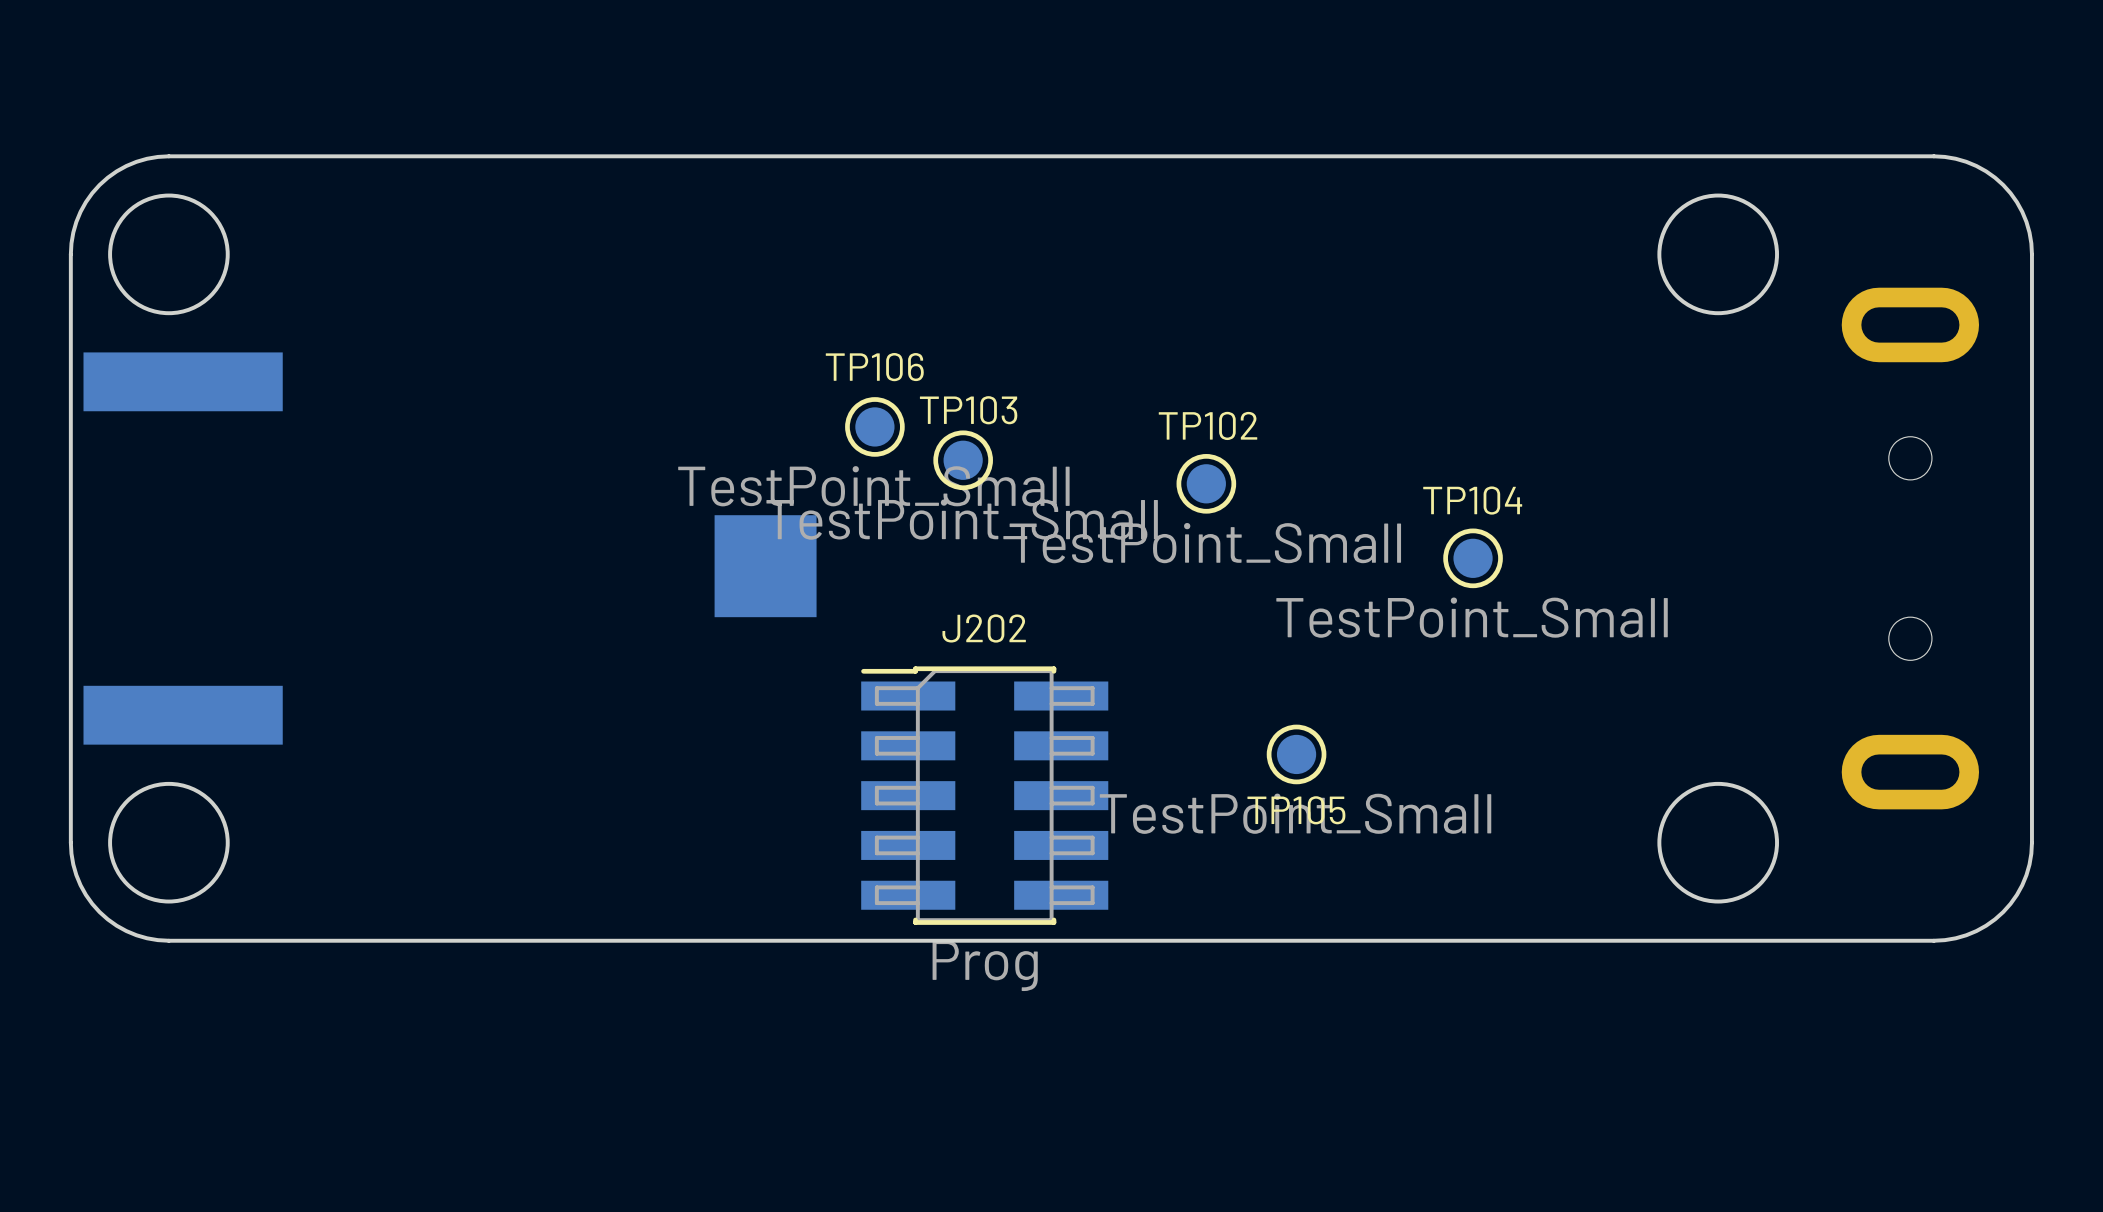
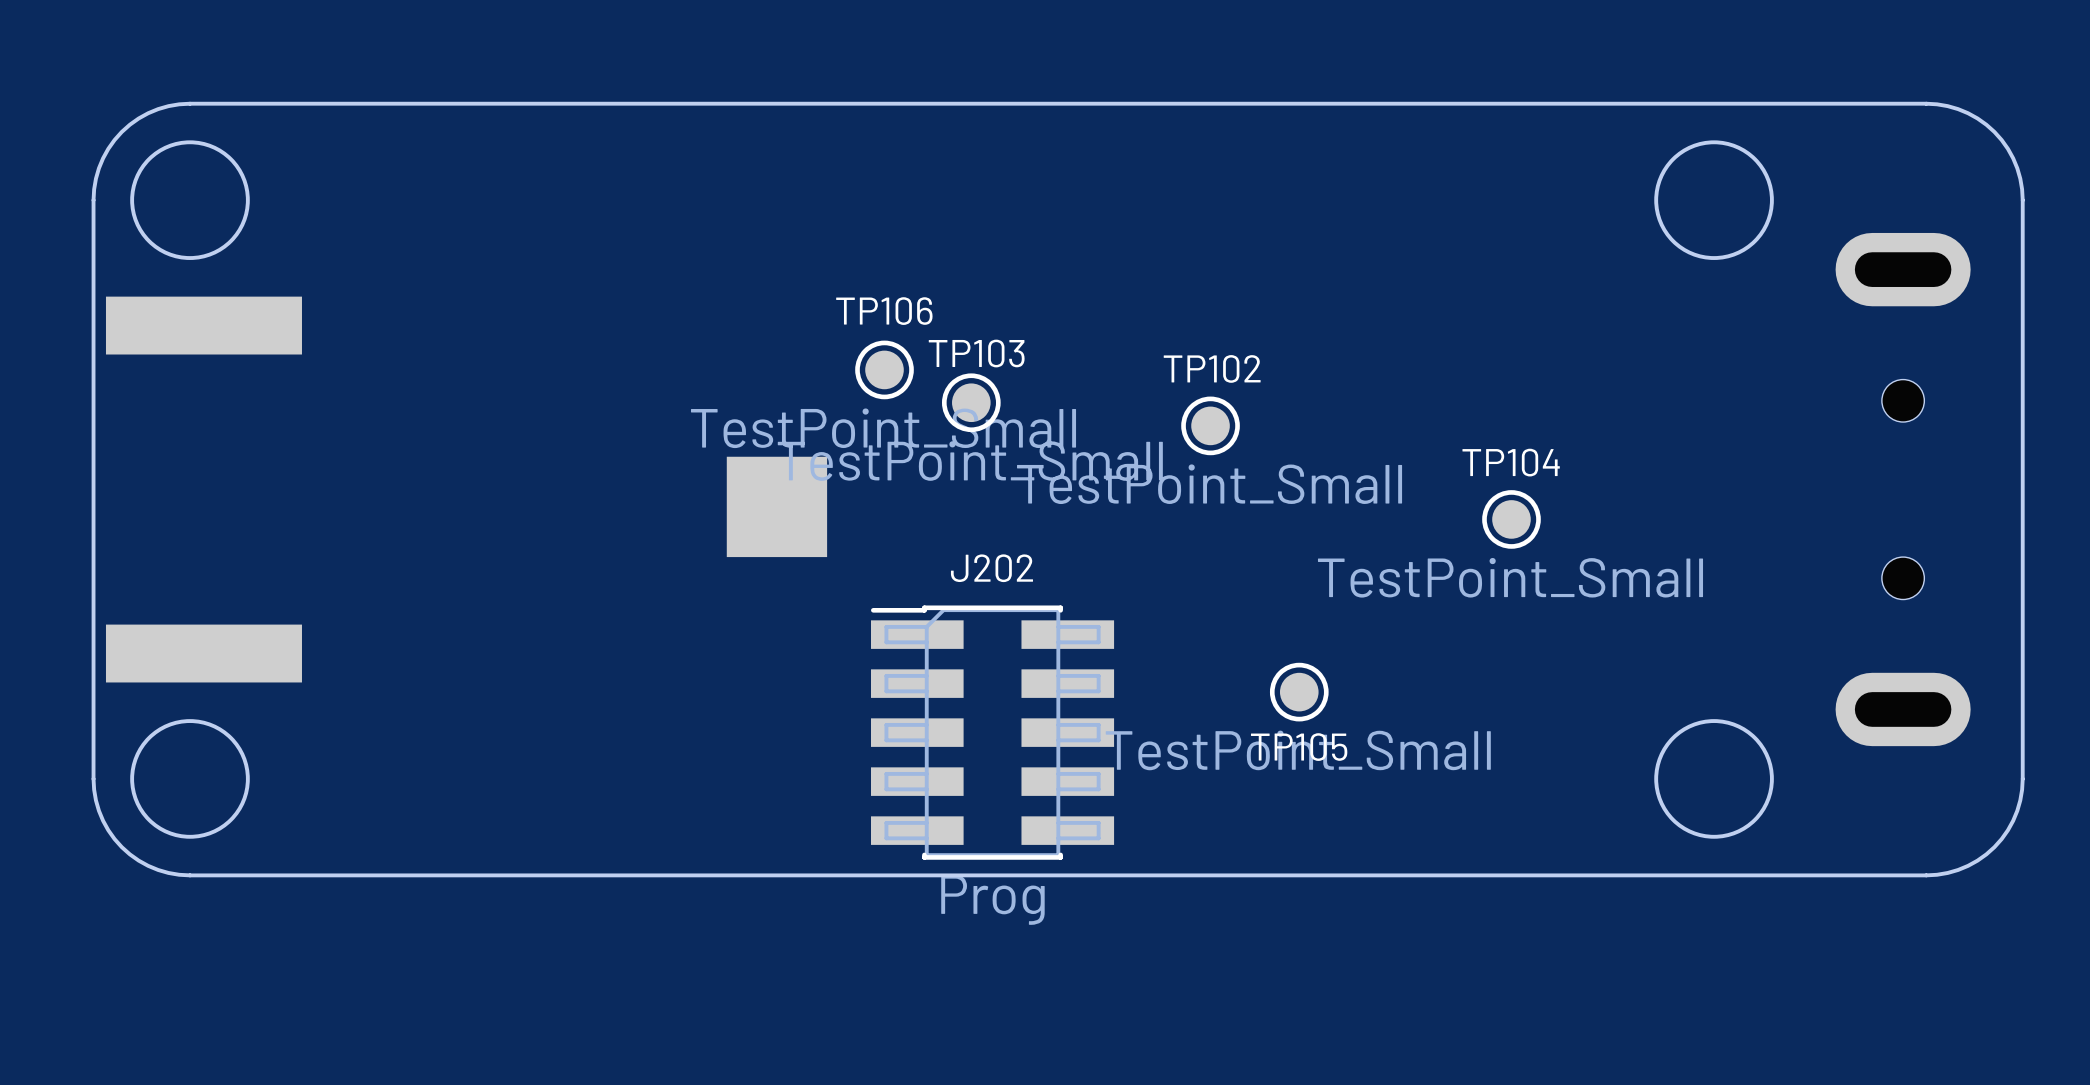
TP104 position: (1473, 558) -> (1511, 519)

